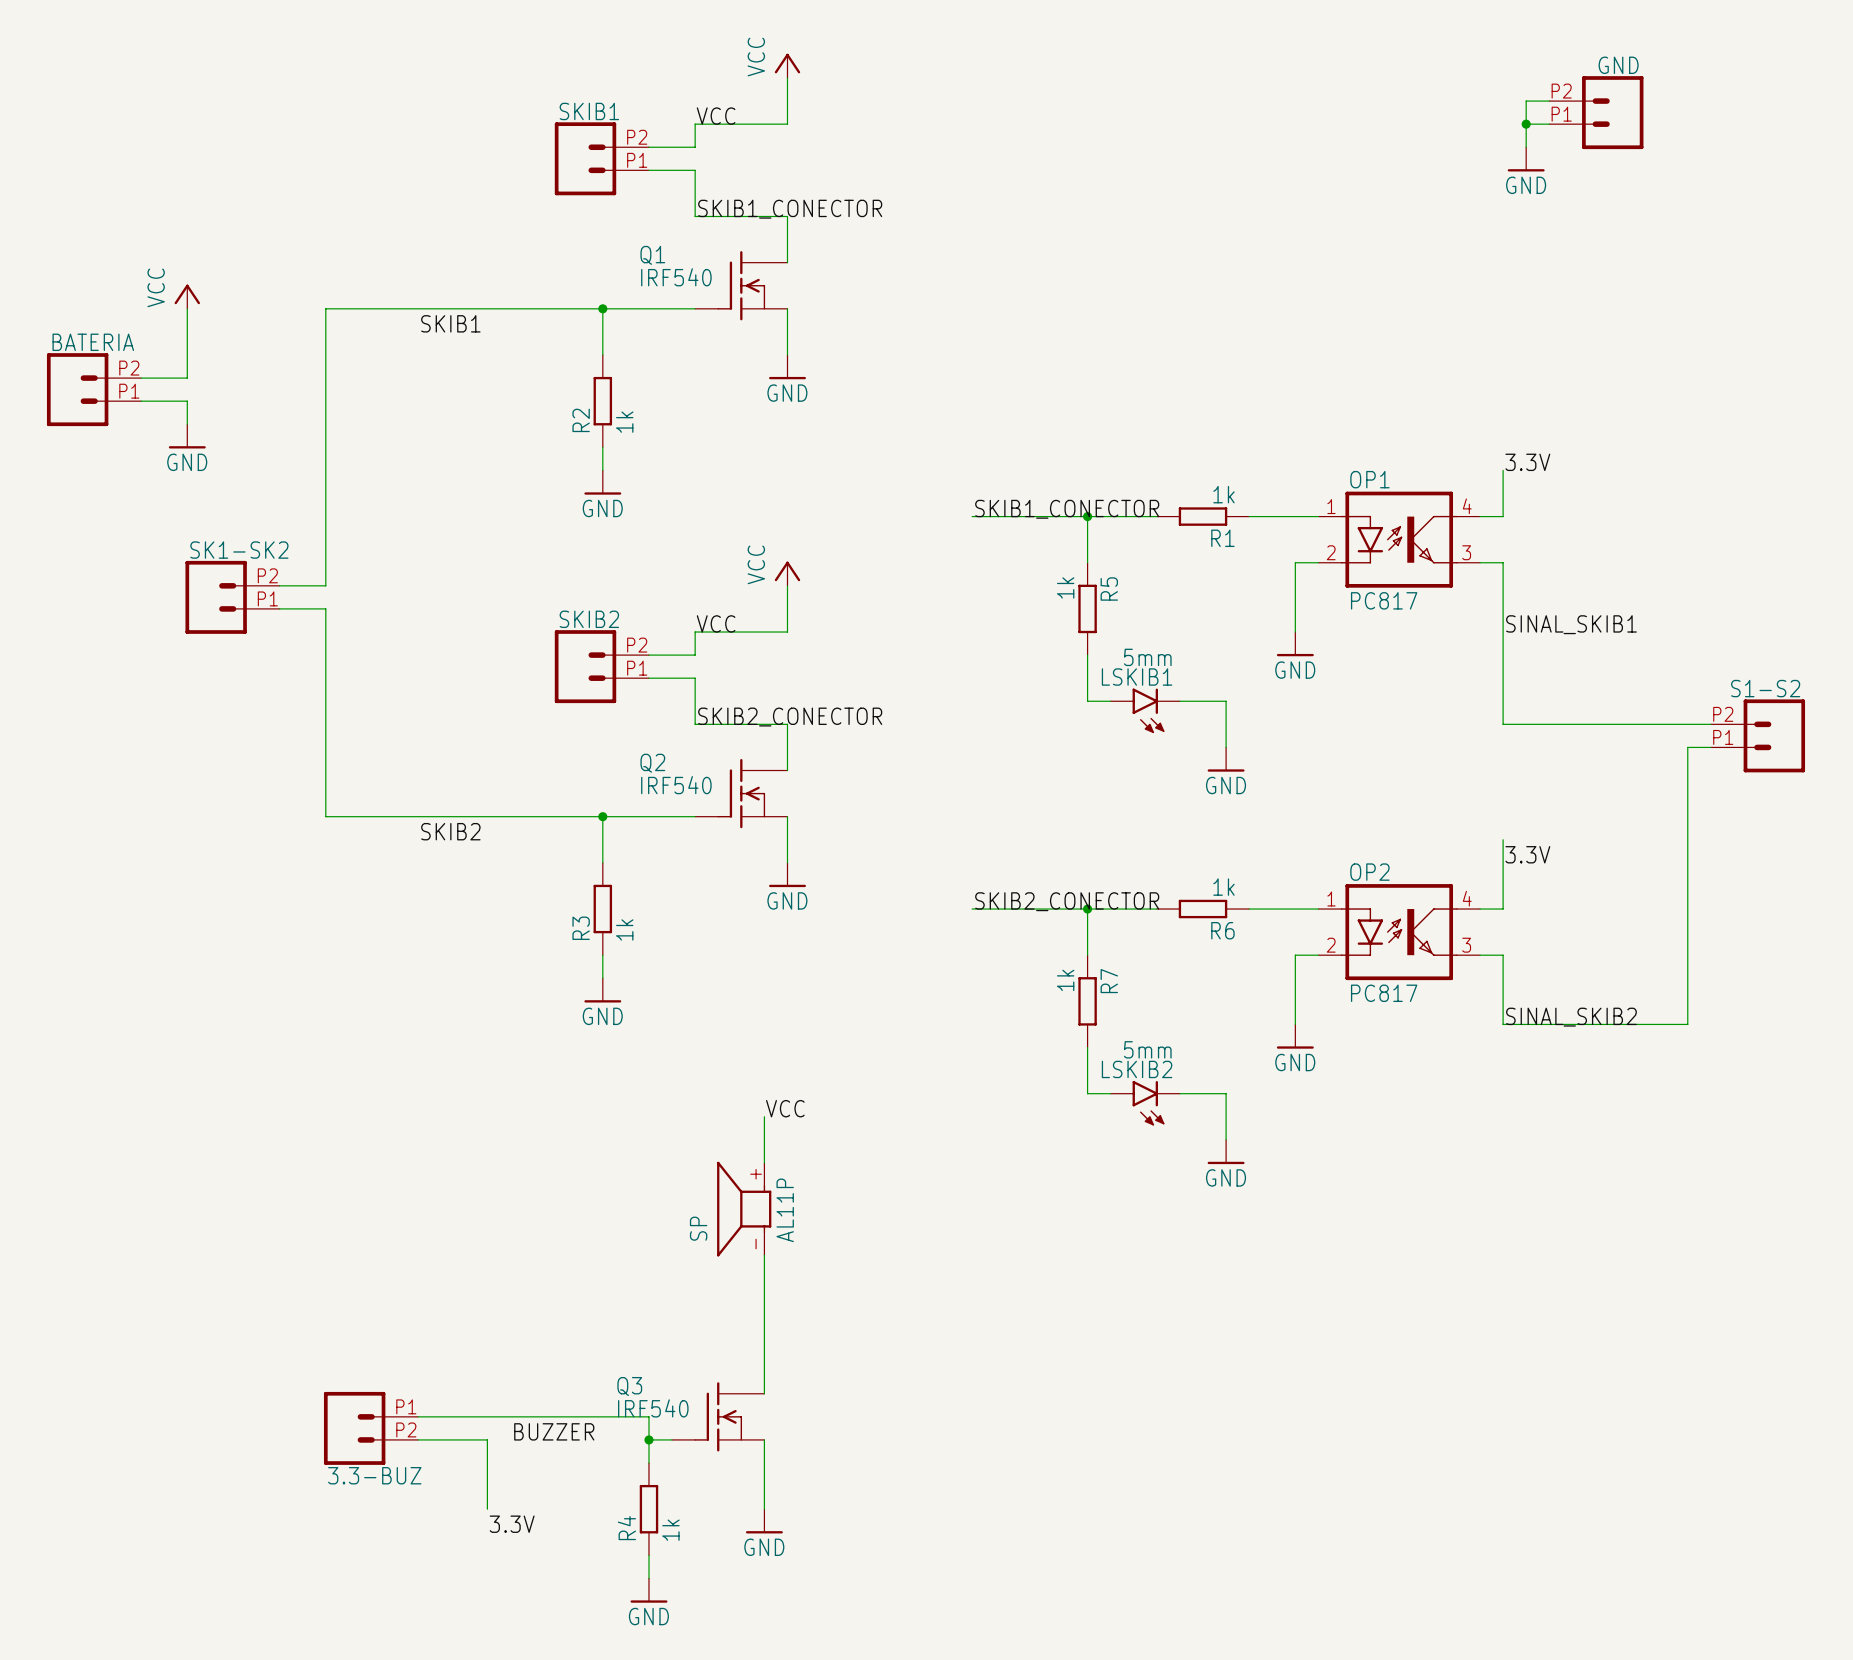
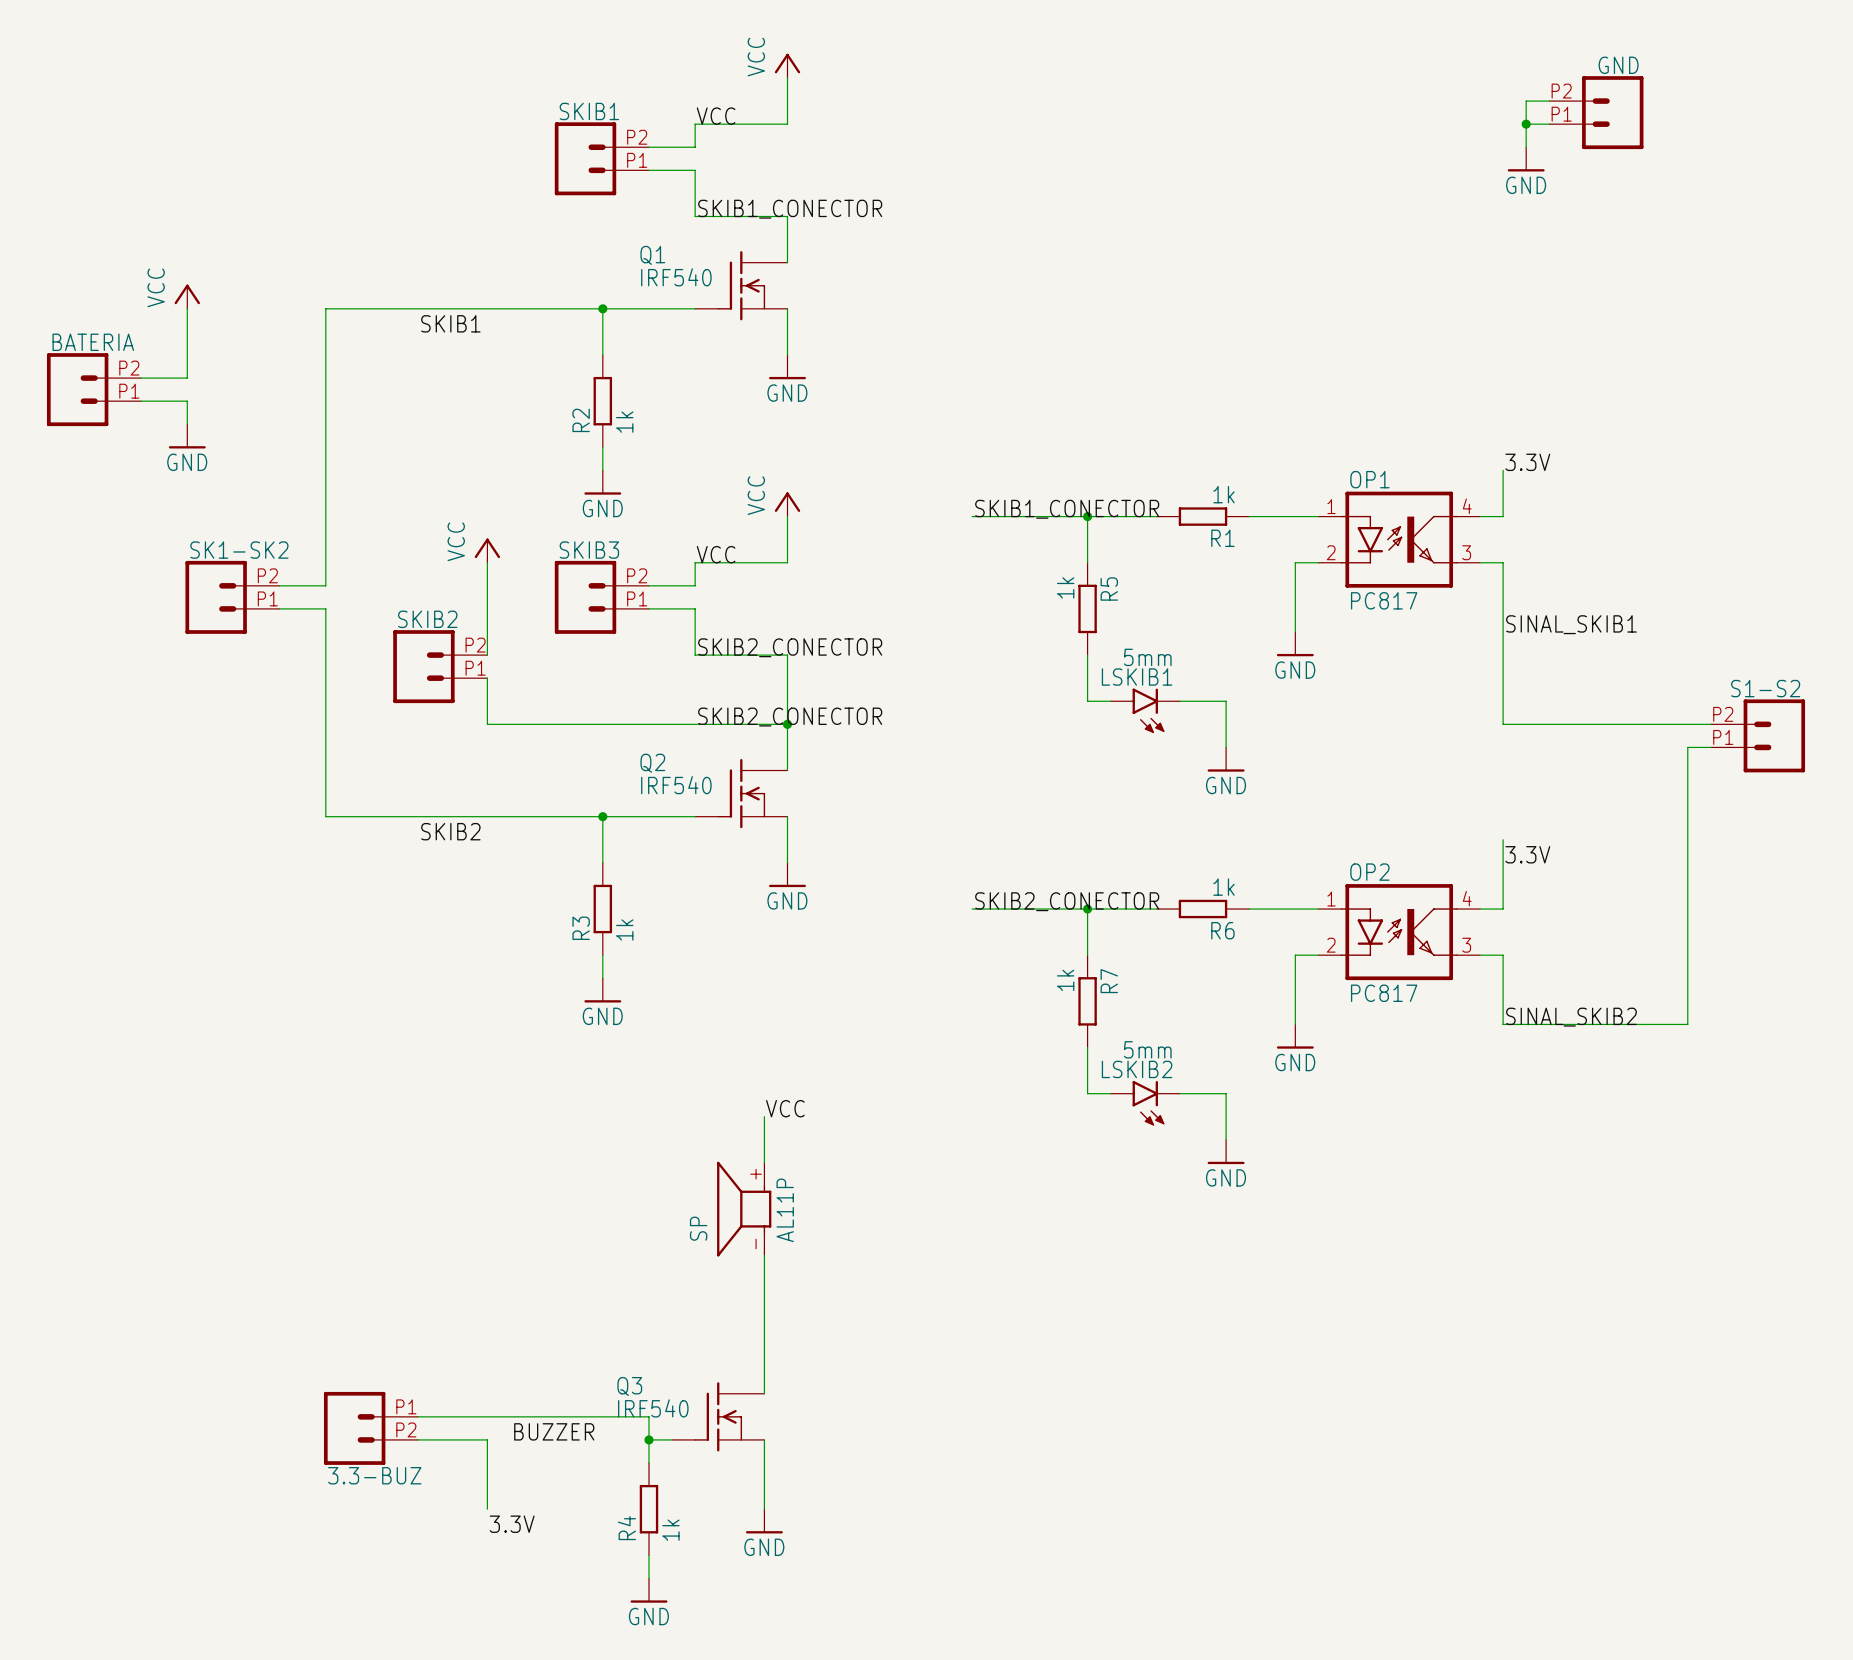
wire: none -> (787, 516) (787, 562) (695, 562) (695, 585) (648, 585)
power symbol: none -> VCC (487, 550)
wire: none -> (487, 562) (487, 655)
power symbol position: VCC (787, 573) -> VCC (787, 504)
wire: (787, 585) (787, 632) (695, 632) -> (648, 608) (695, 608) (695, 632)
SKIB3: none -> (601, 597)
label position: VCC (716, 623) -> VCC (716, 554)
label: none -> SKIB2_CONECTOR (790, 647)
wire: (648, 655) (695, 655) -> (787, 724) (787, 655) (695, 655)
SKIB2 position: (601, 666) -> (440, 666)
wire: (648, 678) (695, 678) (695, 724) -> (487, 678) (487, 724) (695, 724)
junction: none -> (787, 724)

